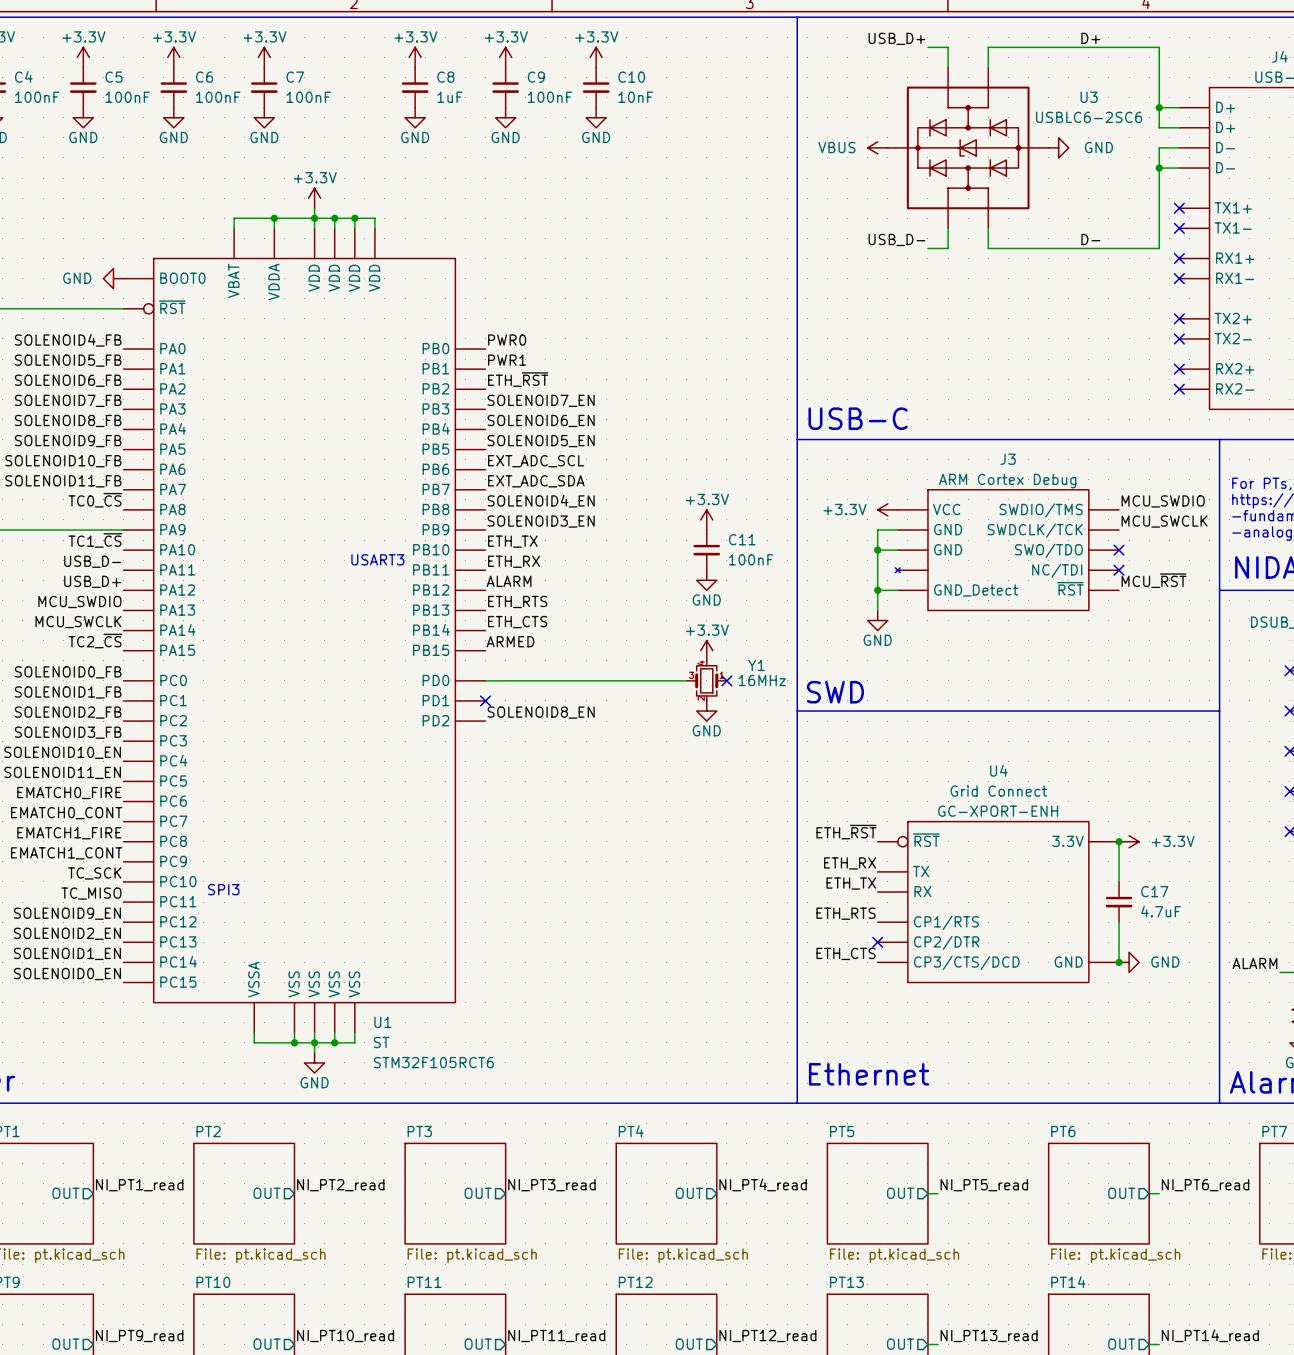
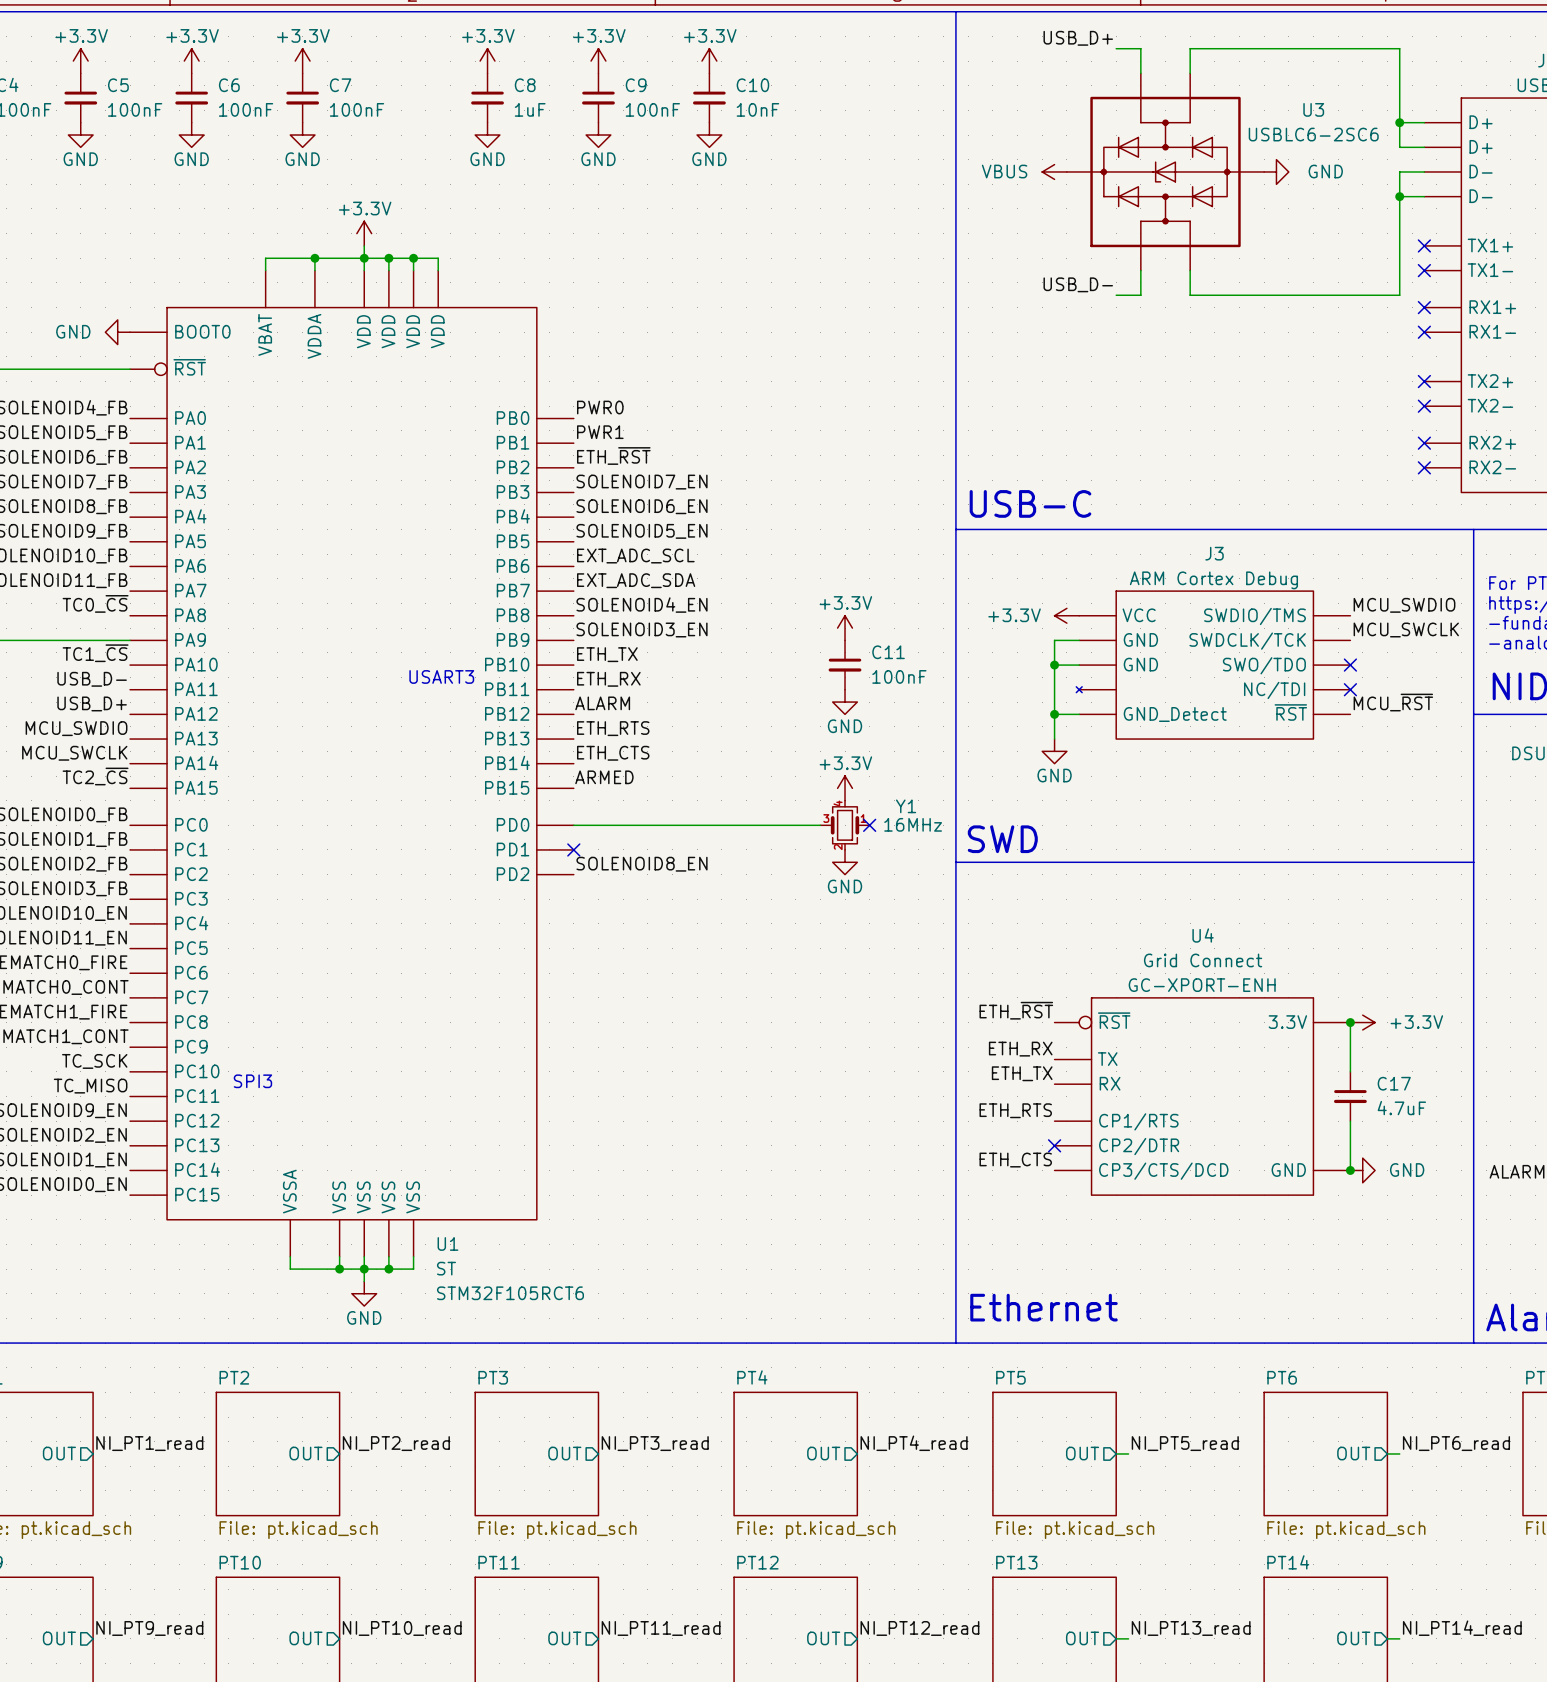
label: D+ (1090, 38) -> none
label: D- (1090, 239) -> none

